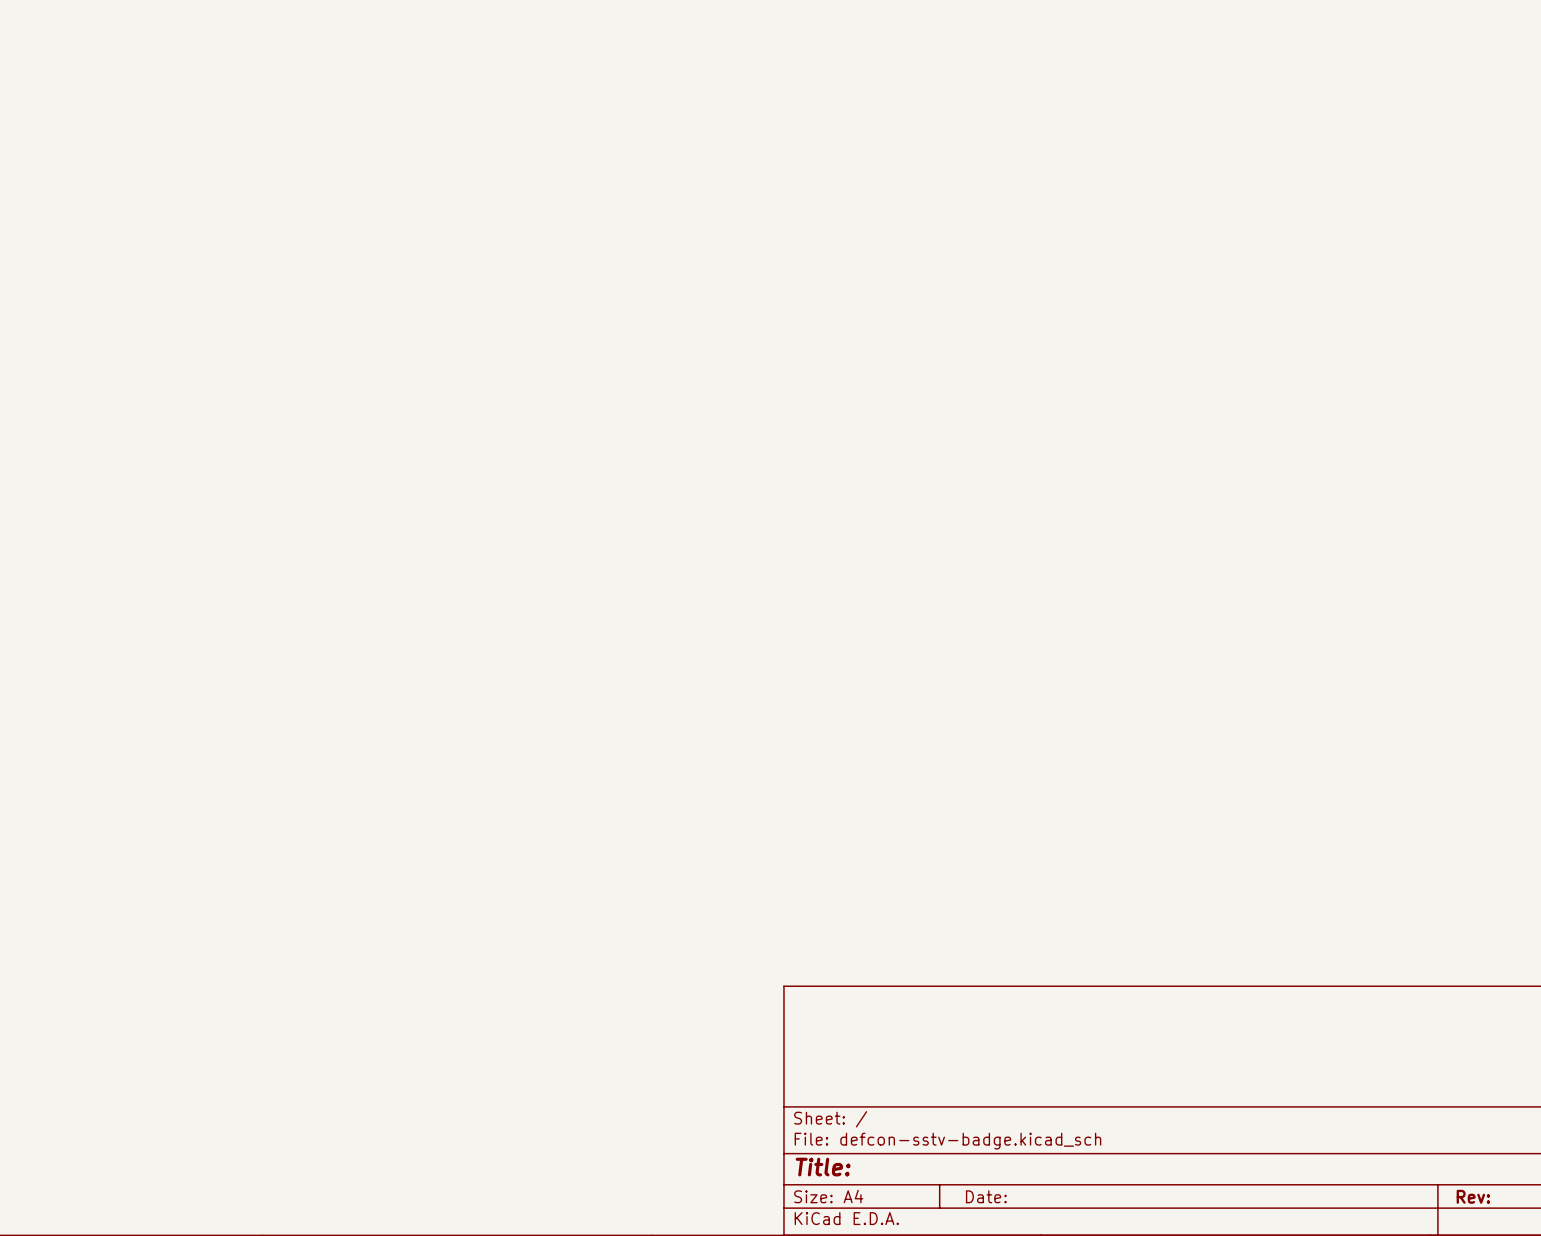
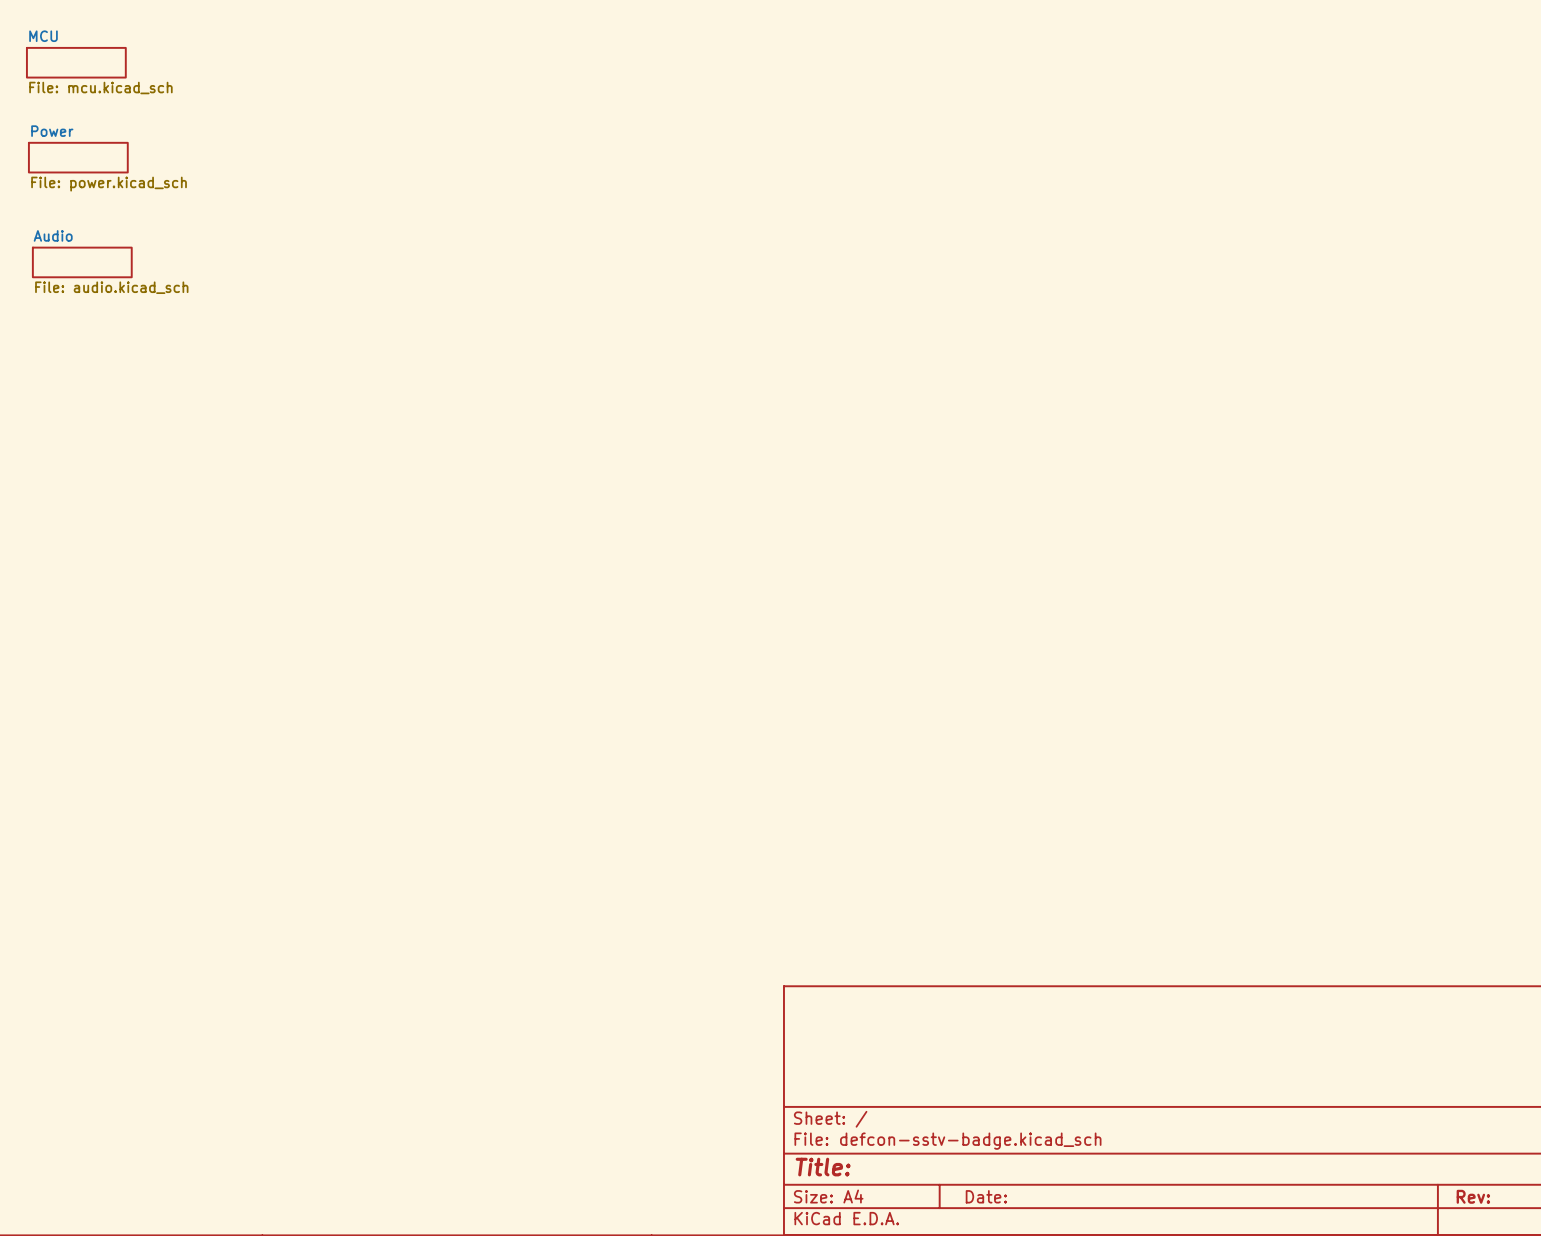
sheet MCU: none -> File: mcu.kicad_sch (76, 62)
sheet Power: none -> File: power.kicad_sch (78, 157)
sheet Audio: none -> File: audio.kicad_sch (82, 262)

